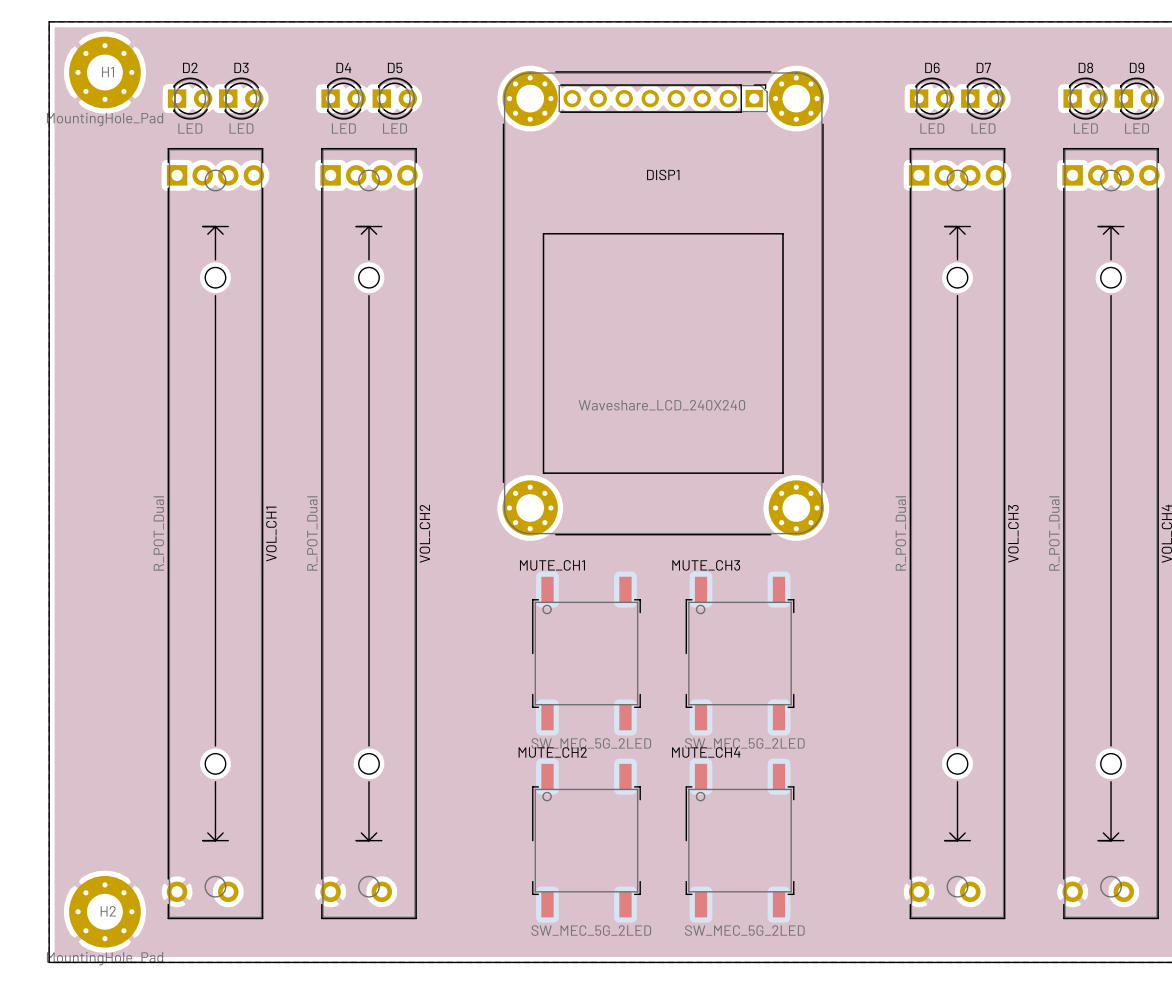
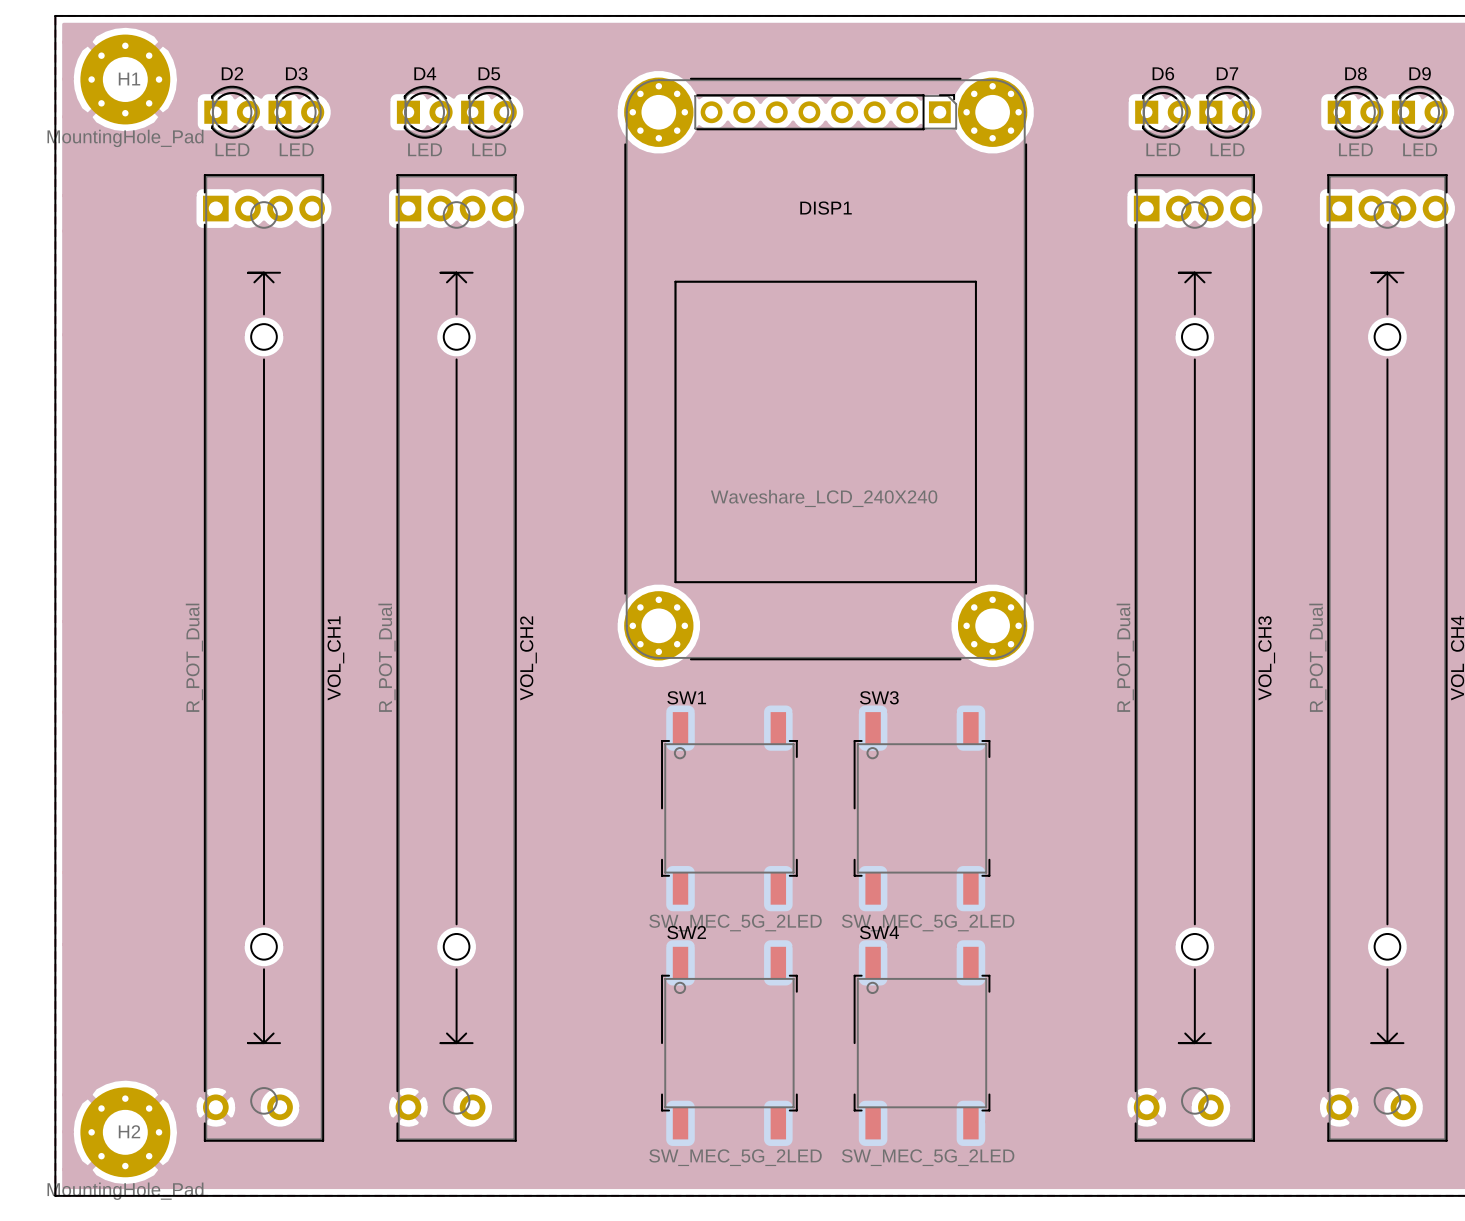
MUTE_CH1 name: MUTE_CH1 (552, 565) -> SW1 (686, 697)
MUTE_CH3 name: MUTE_CH3 (706, 565) -> SW3 (879, 697)
MUTE_CH2 name: MUTE_CH2 (552, 752) -> SW2 (686, 932)
MUTE_CH4 name: MUTE_CH4 (706, 752) -> SW4 (879, 932)

